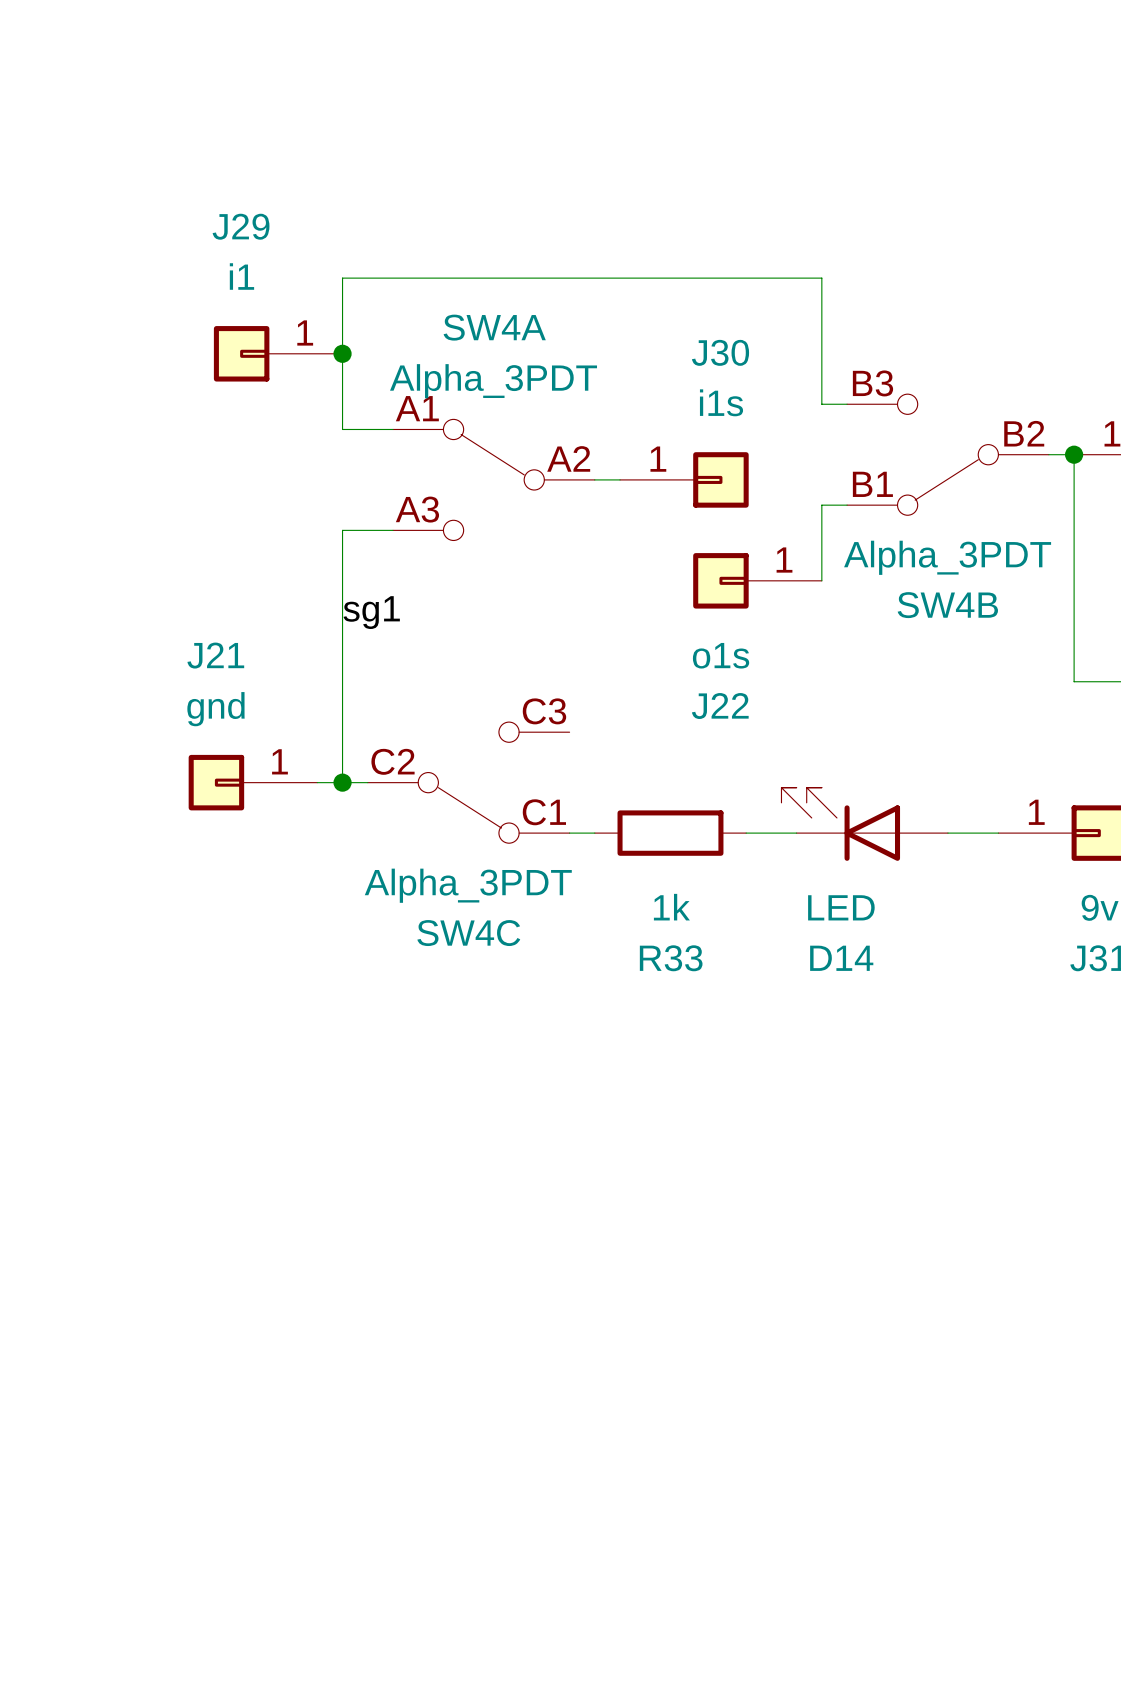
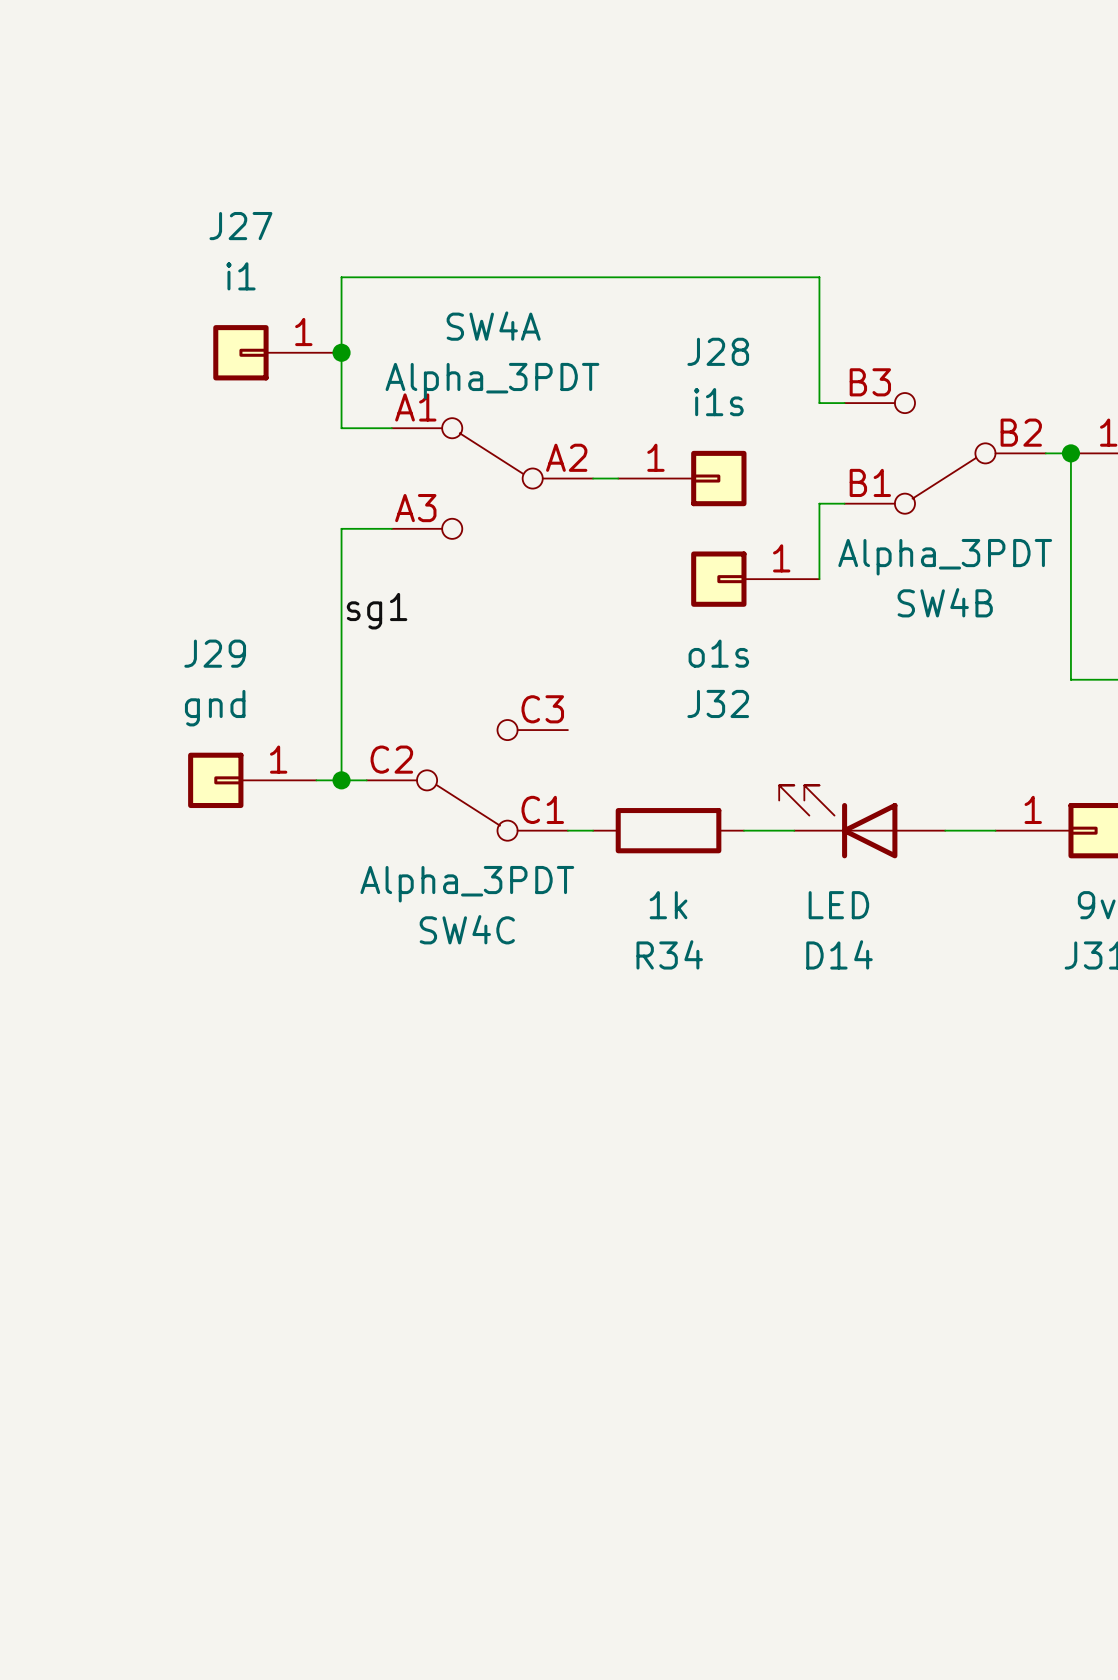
J29 name: J29 (241, 226) -> J27 (240, 226)
J30 name: J30 (720, 352) -> J28 (718, 351)
J21 name: J21 (215, 655) -> J29 (215, 653)
J22 name: J22 (720, 706) -> J32 (718, 703)
R33 name: R33 (671, 958) -> R34 (669, 954)

